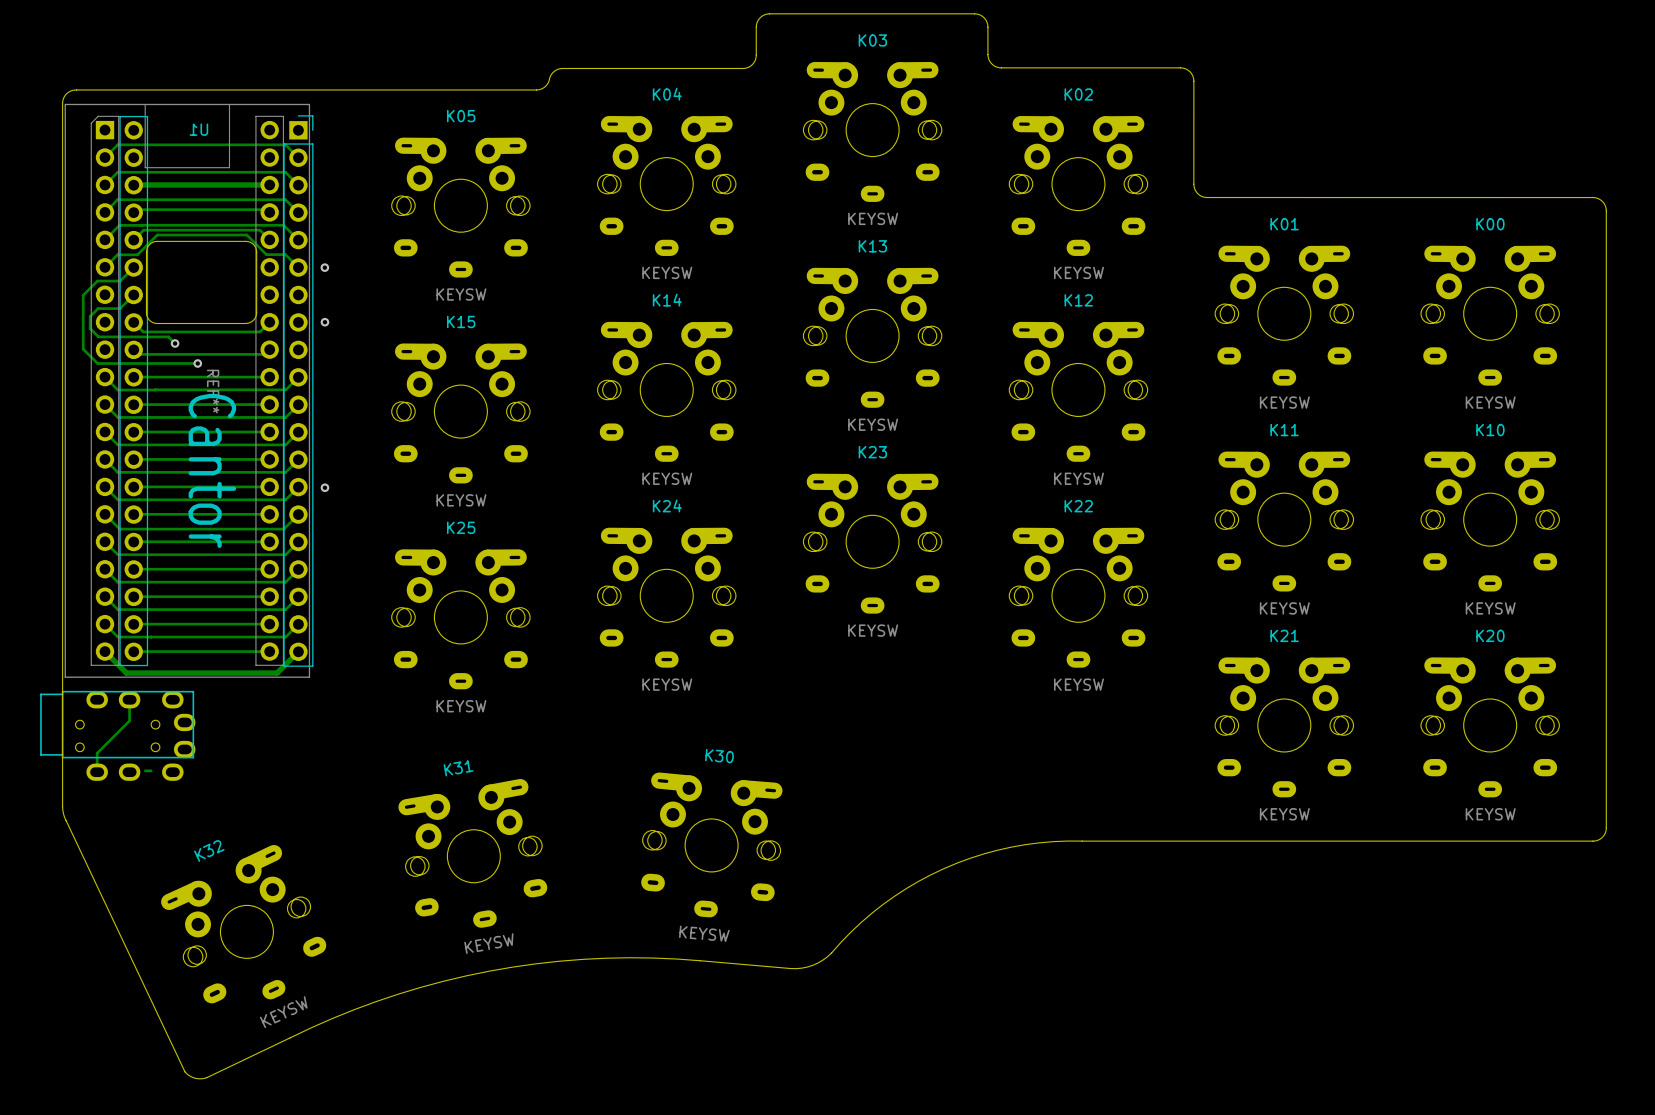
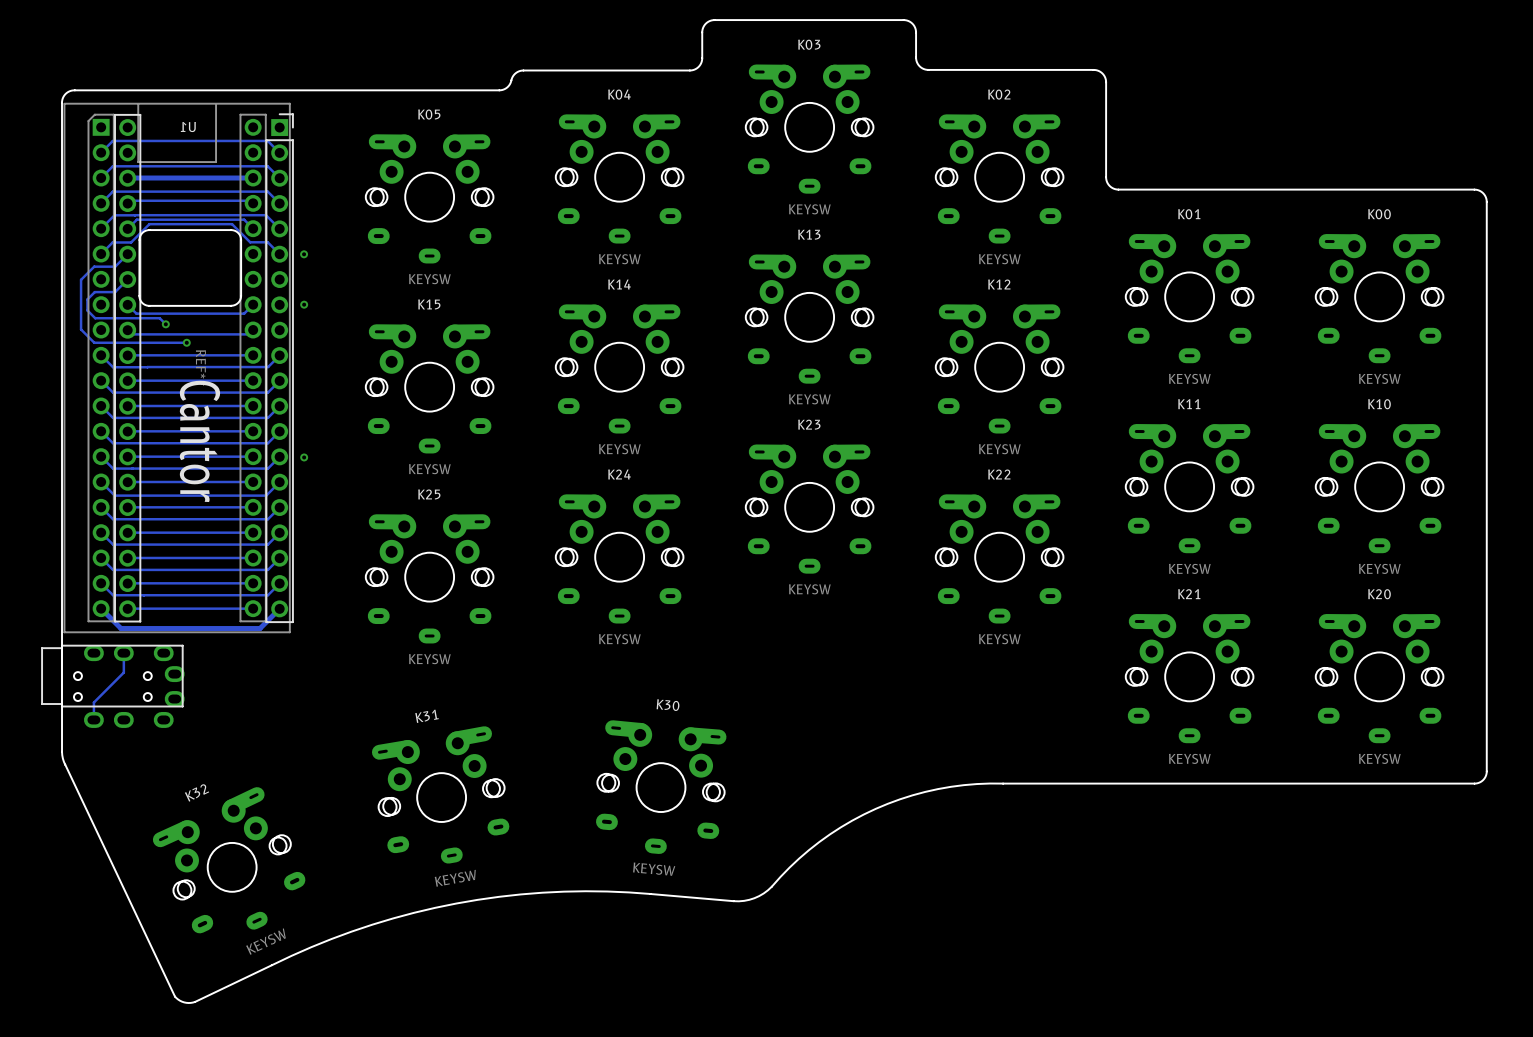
track: (151, 770) (145, 770) -> none

